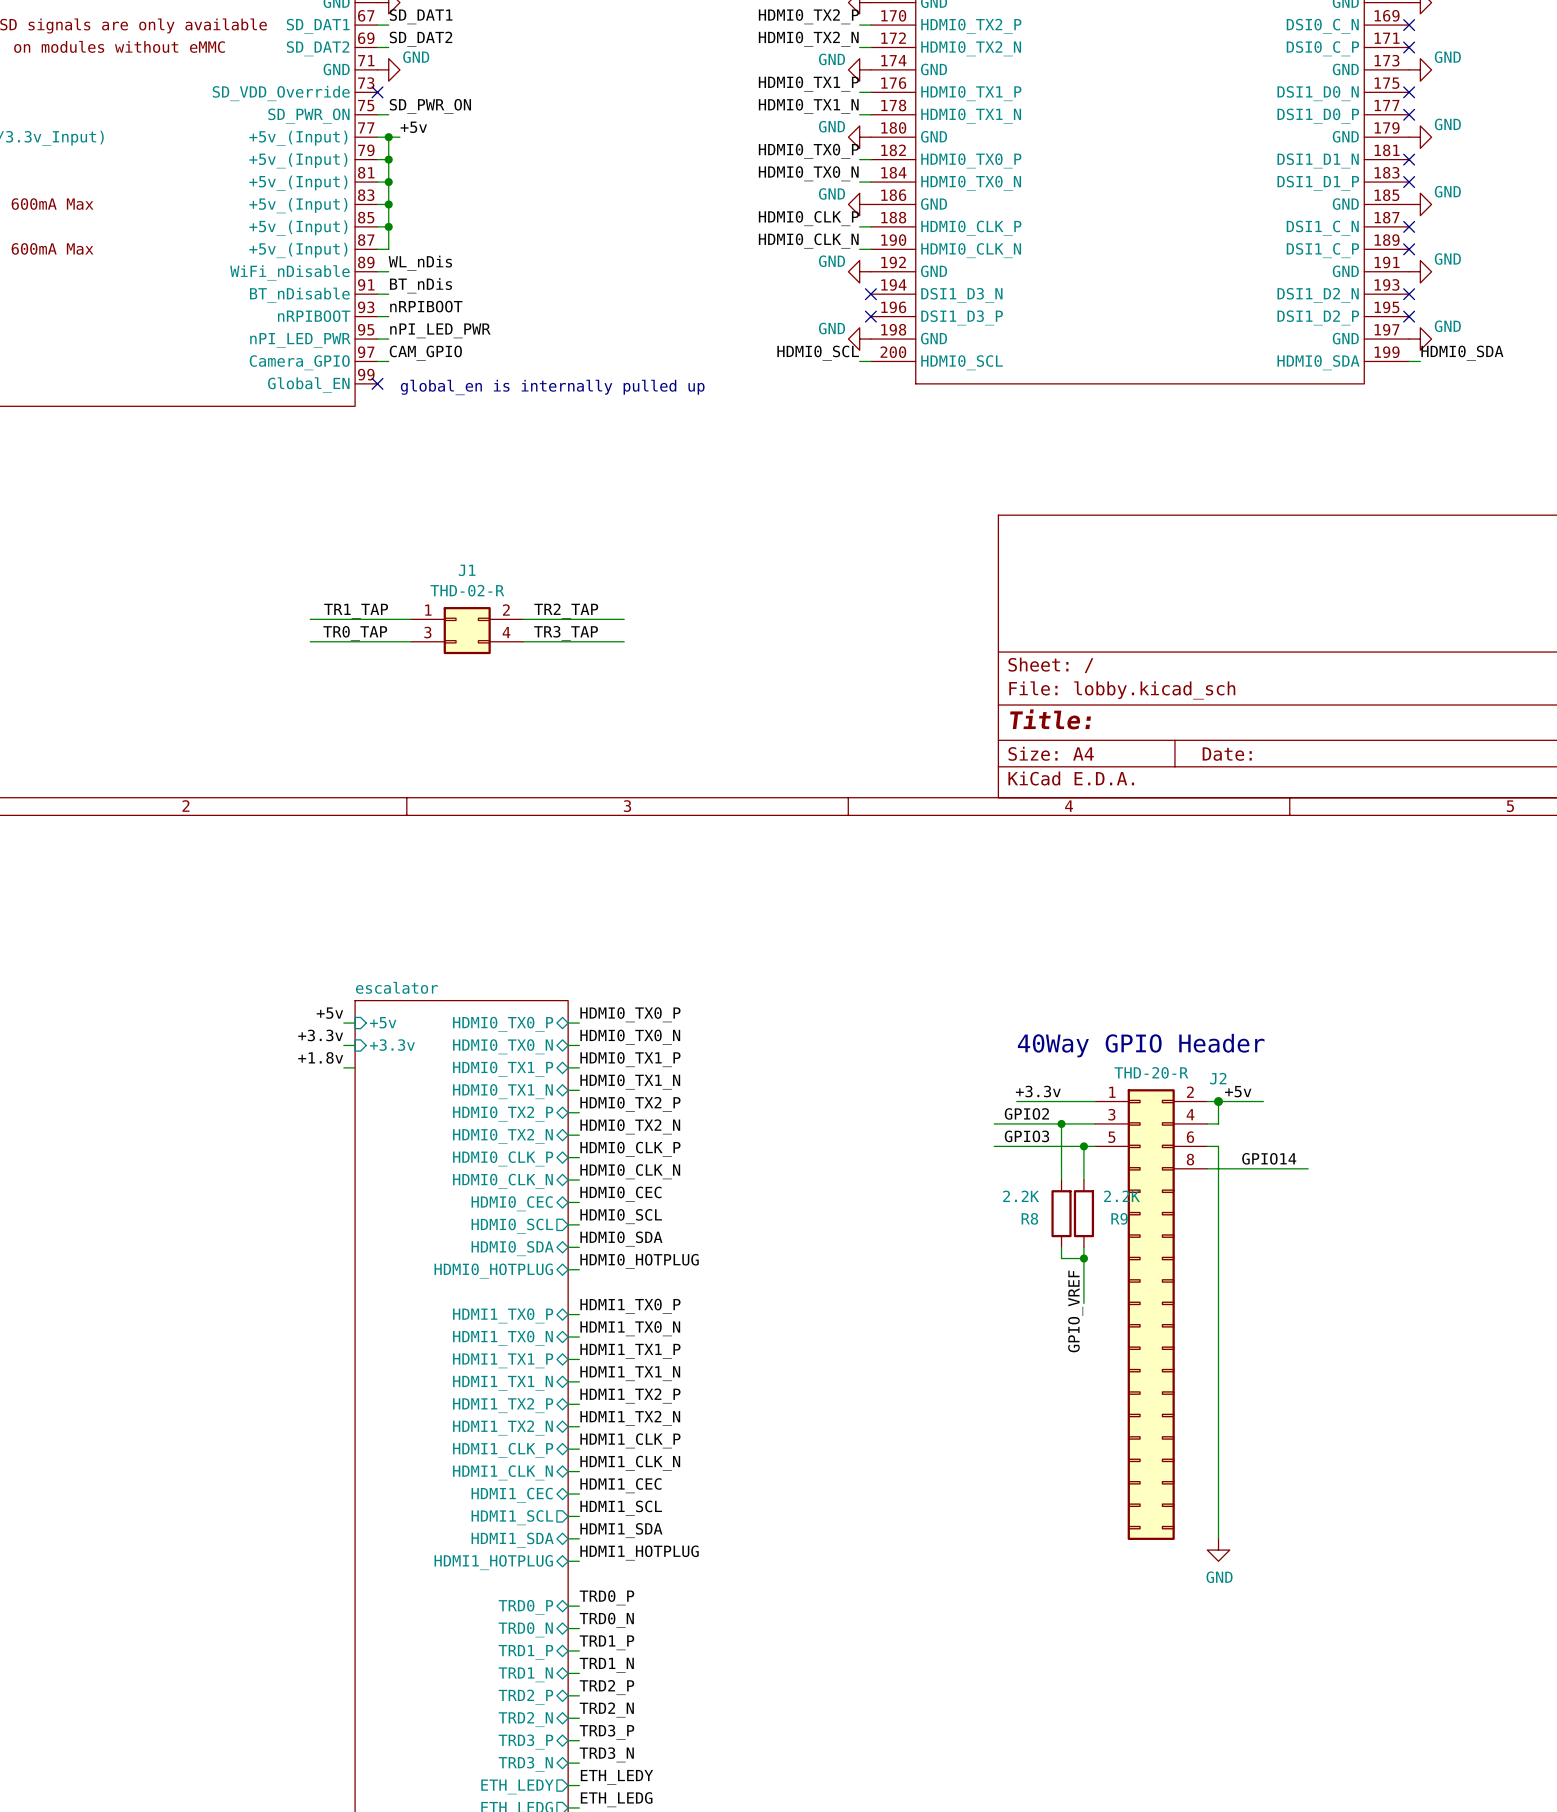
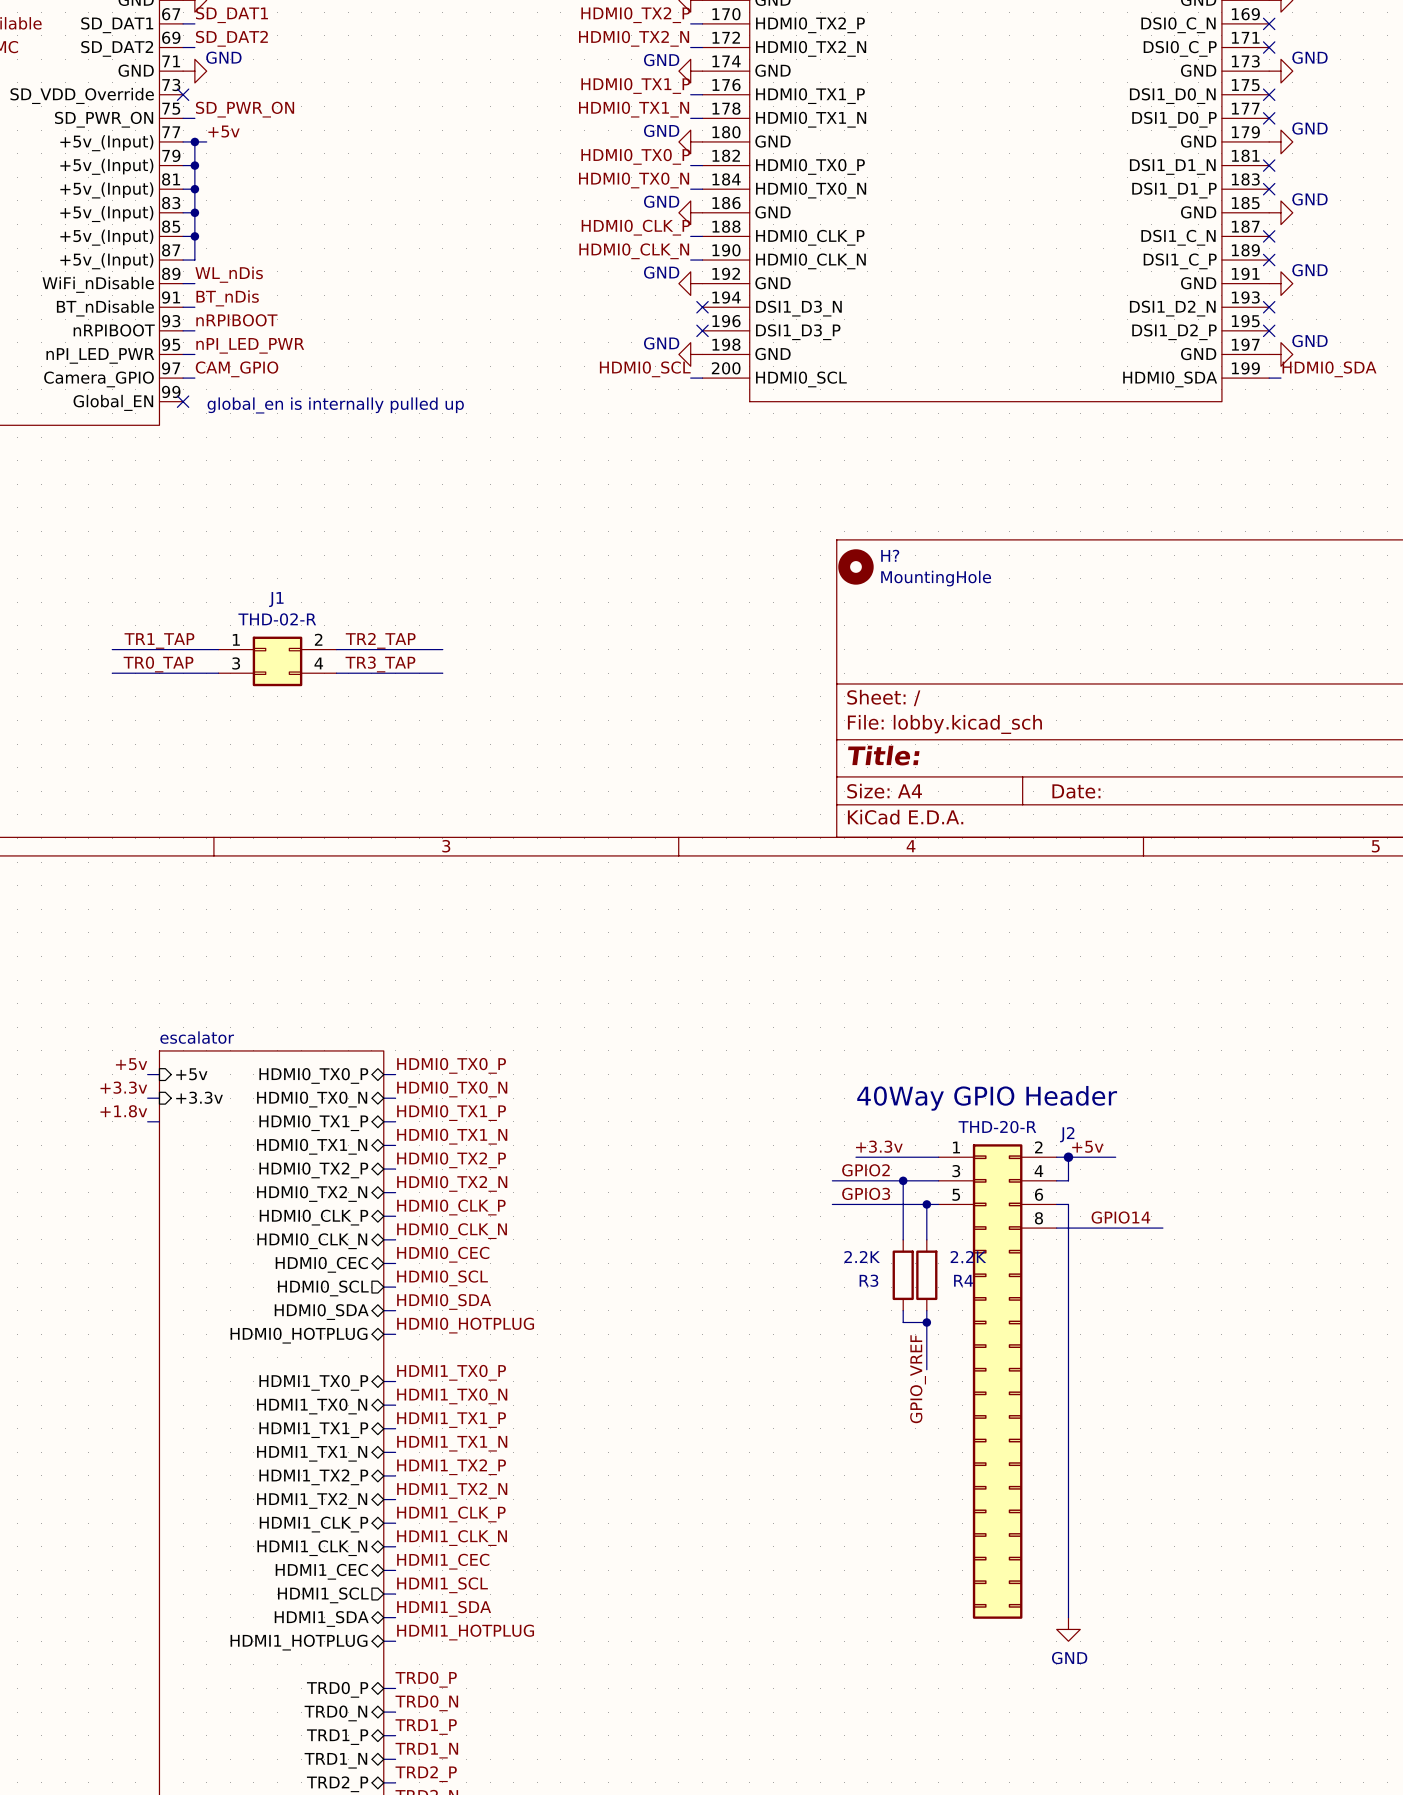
H?: none -> MountingHole (855, 566)
R8 name: R8 (1029, 1218) -> R3 (868, 1280)
R9 name: R9 (1119, 1218) -> R4 (963, 1280)

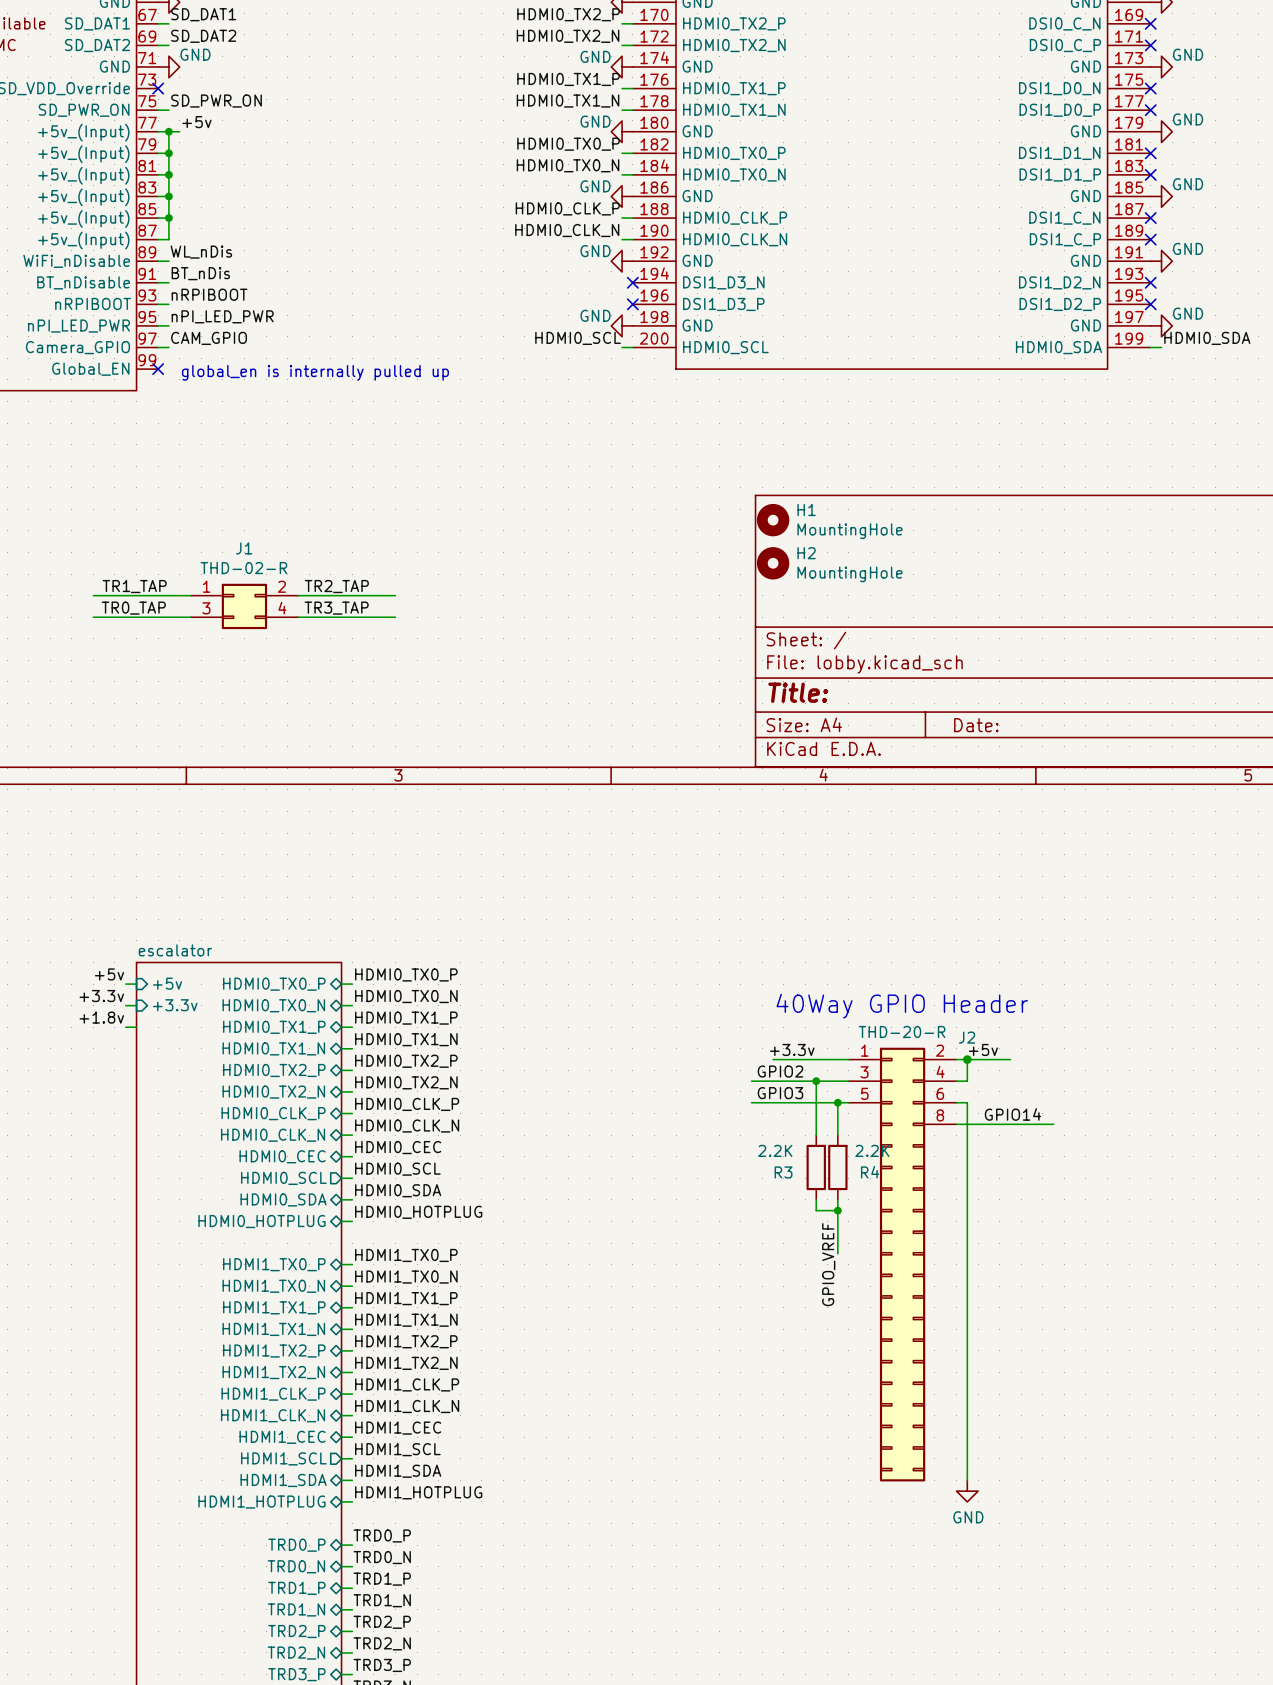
H? name: H? (890, 555) -> H1 (806, 510)
H2: none -> MountingHole (773, 563)

